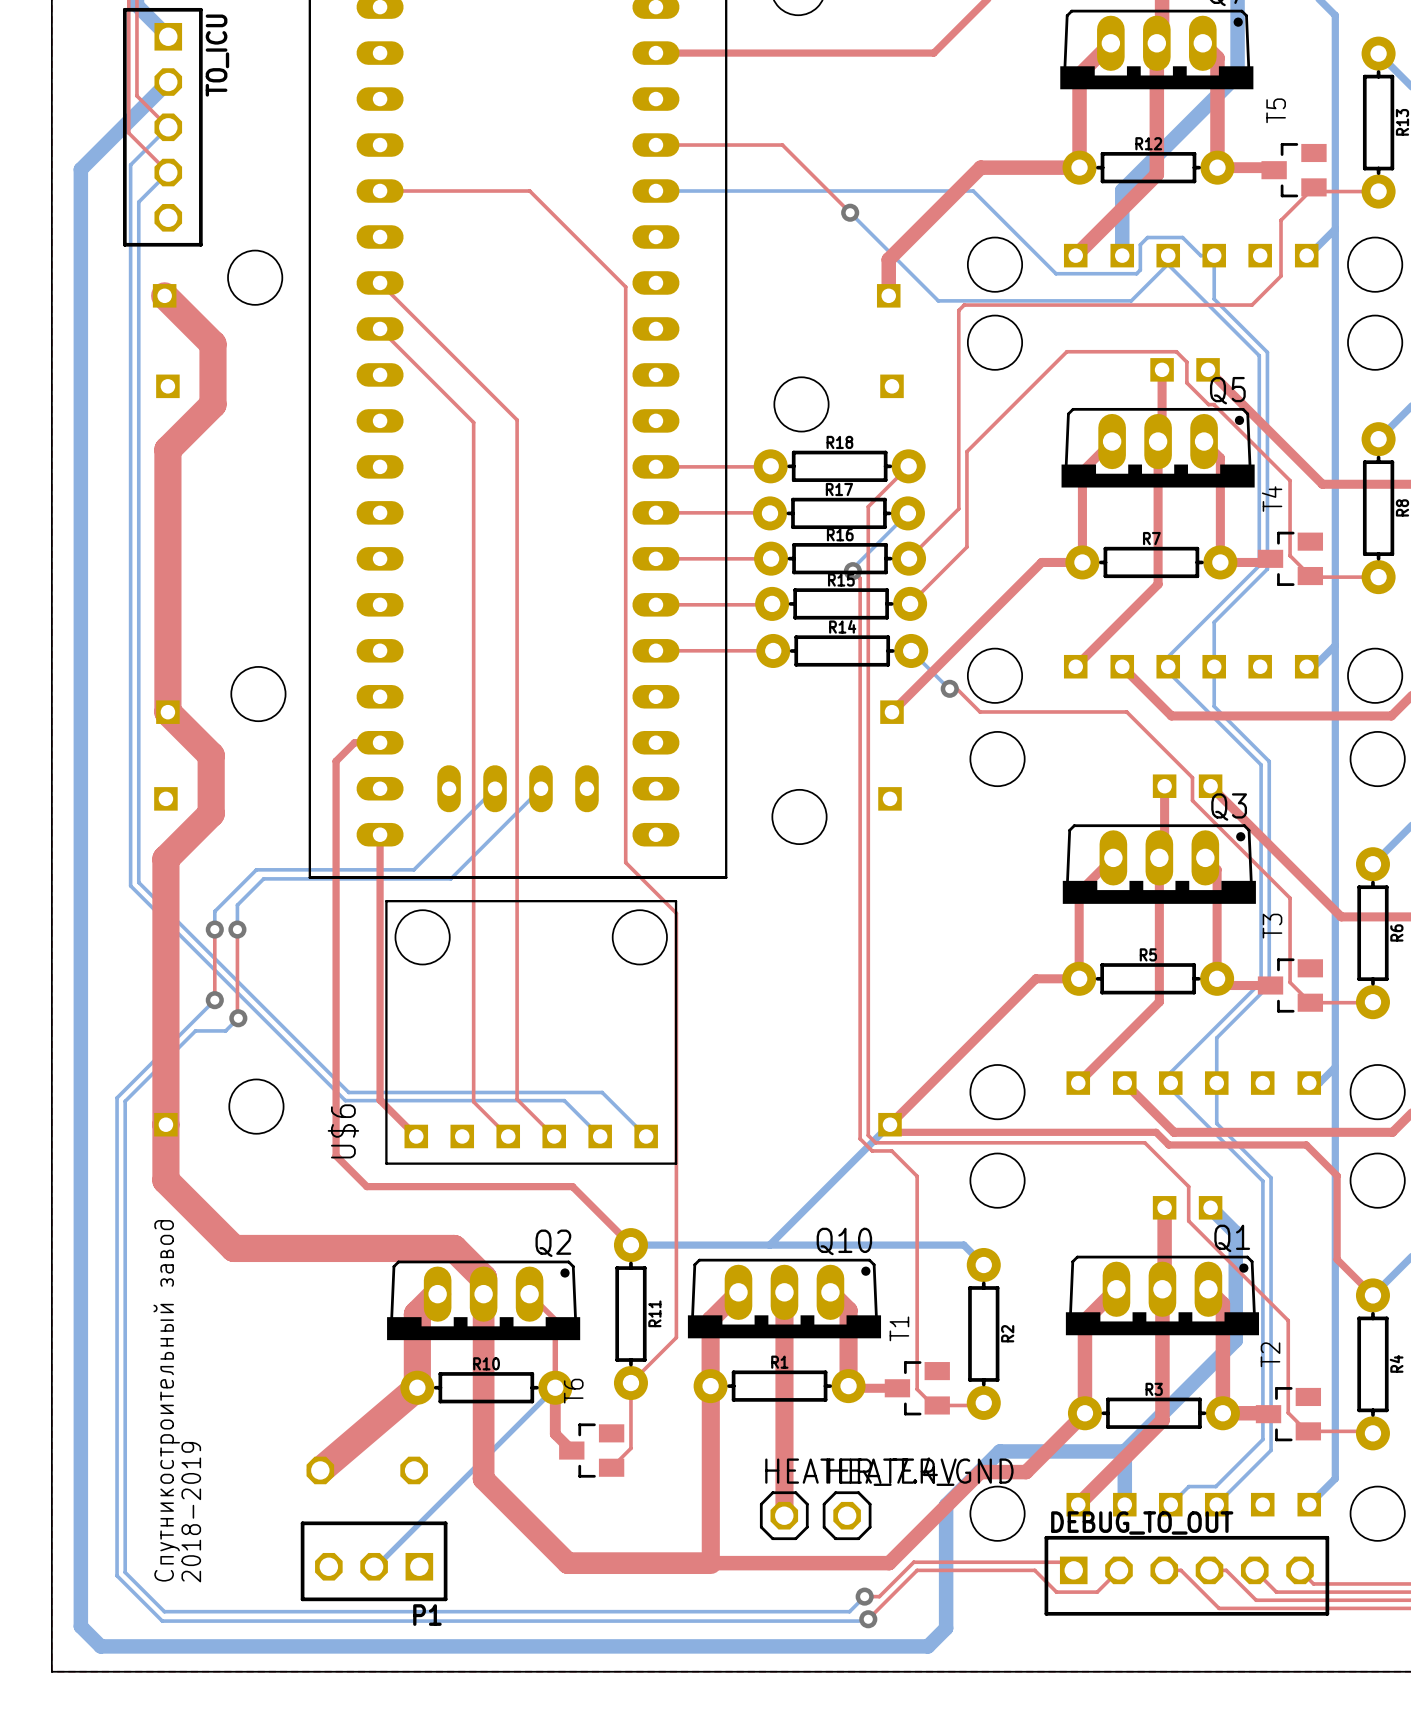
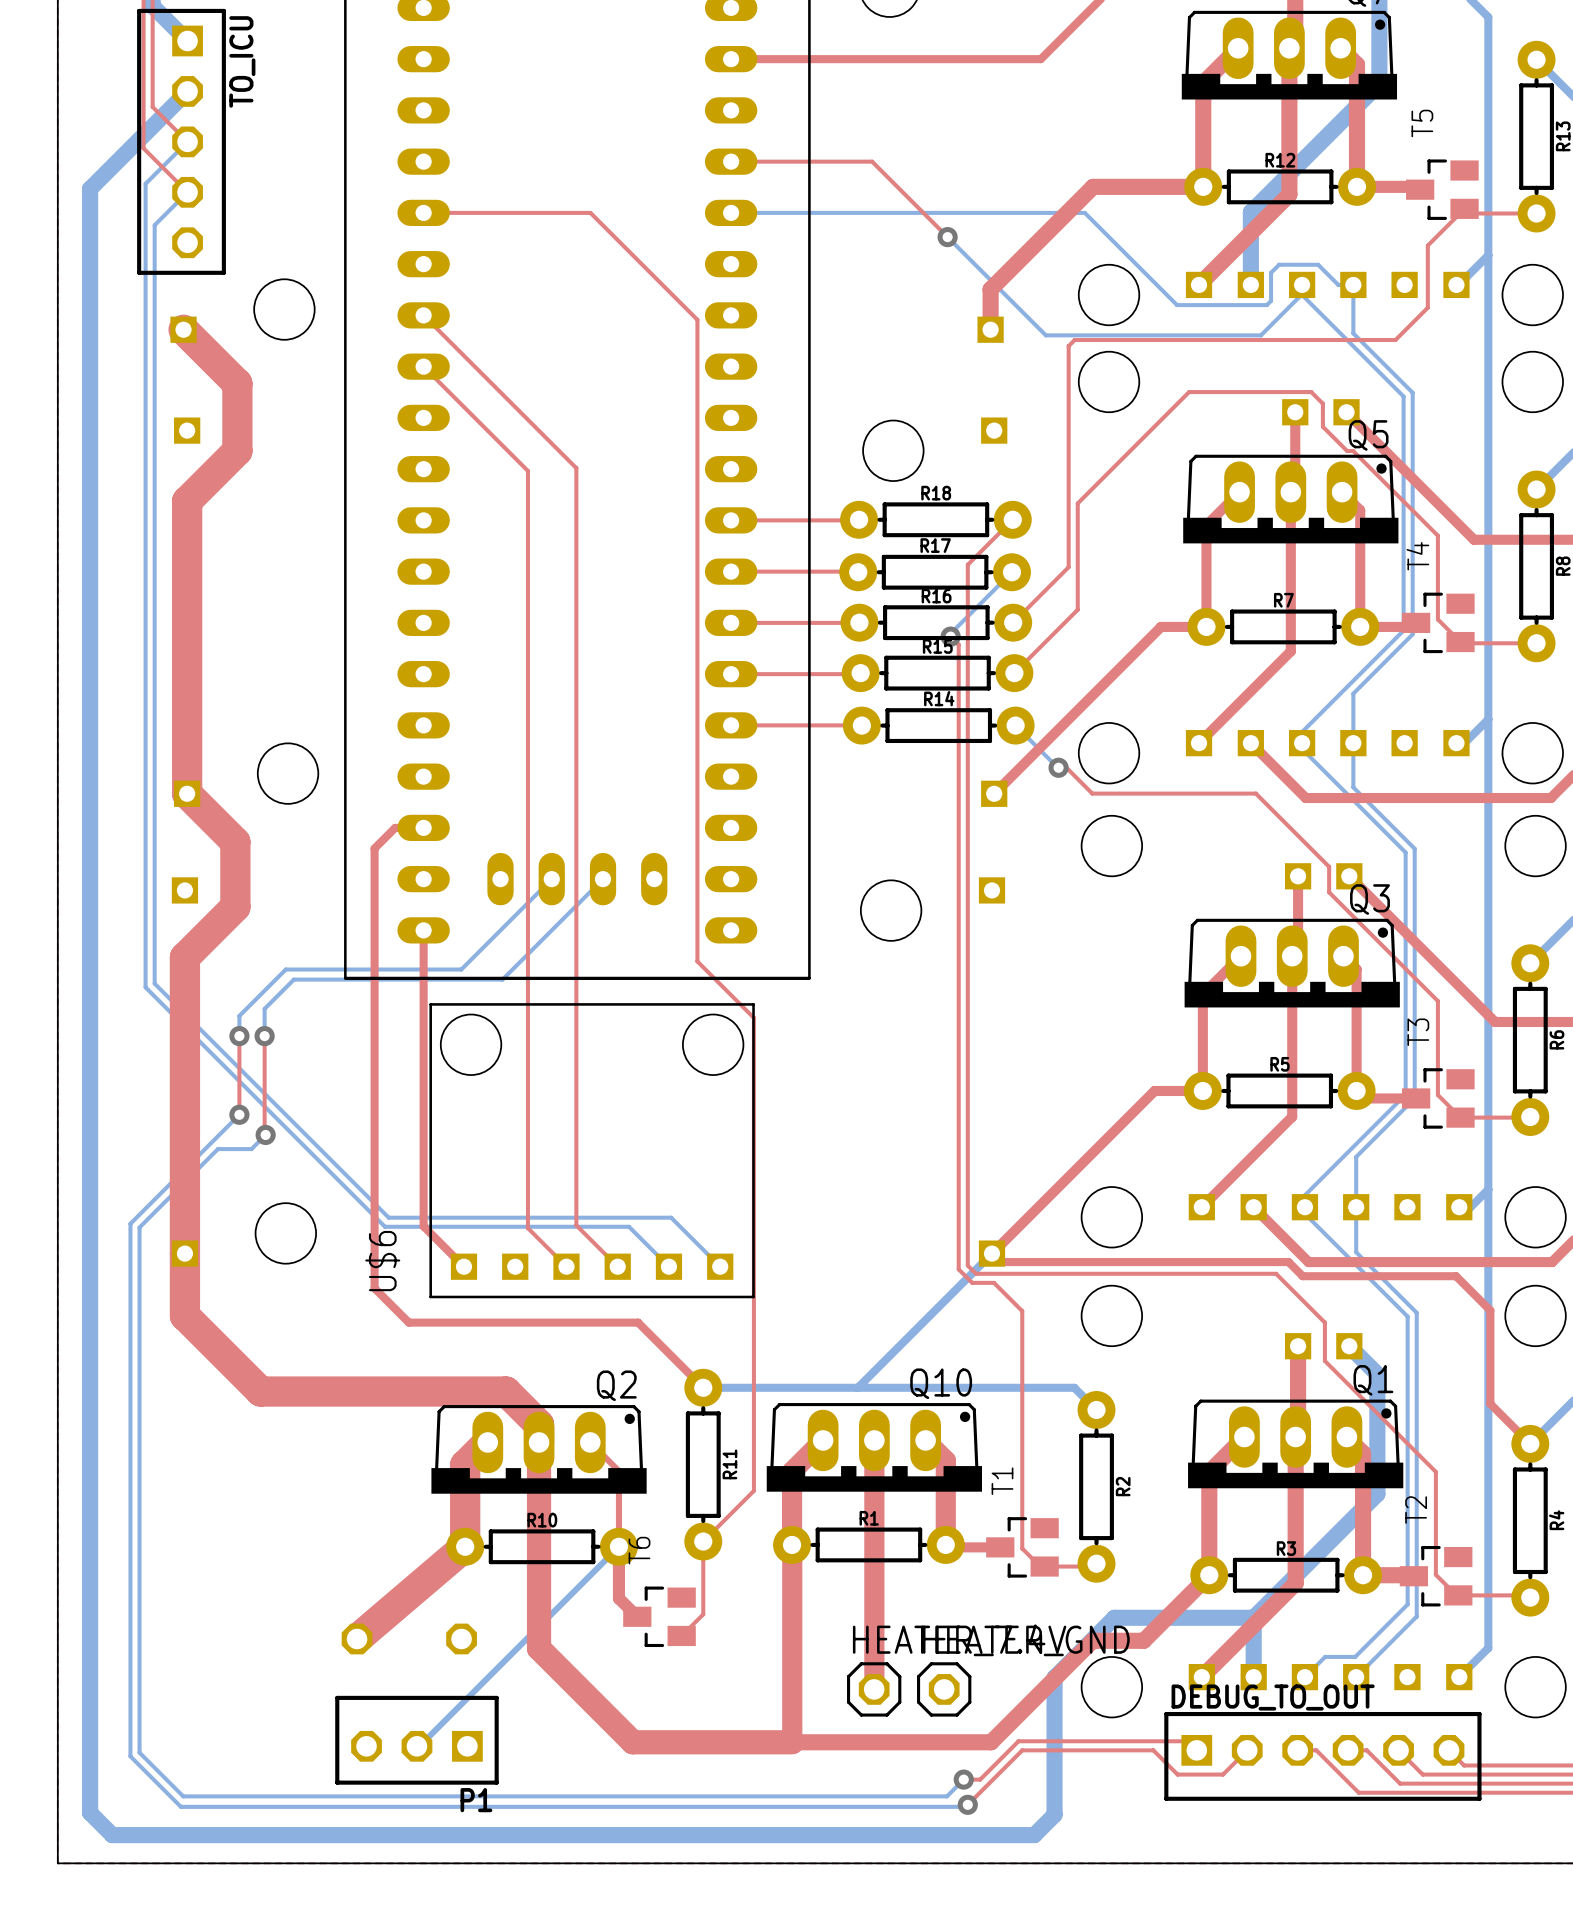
text: Спутникостроительный завод (166, 1400) -> none
text: 2018-2019 (191, 1512) -> none

